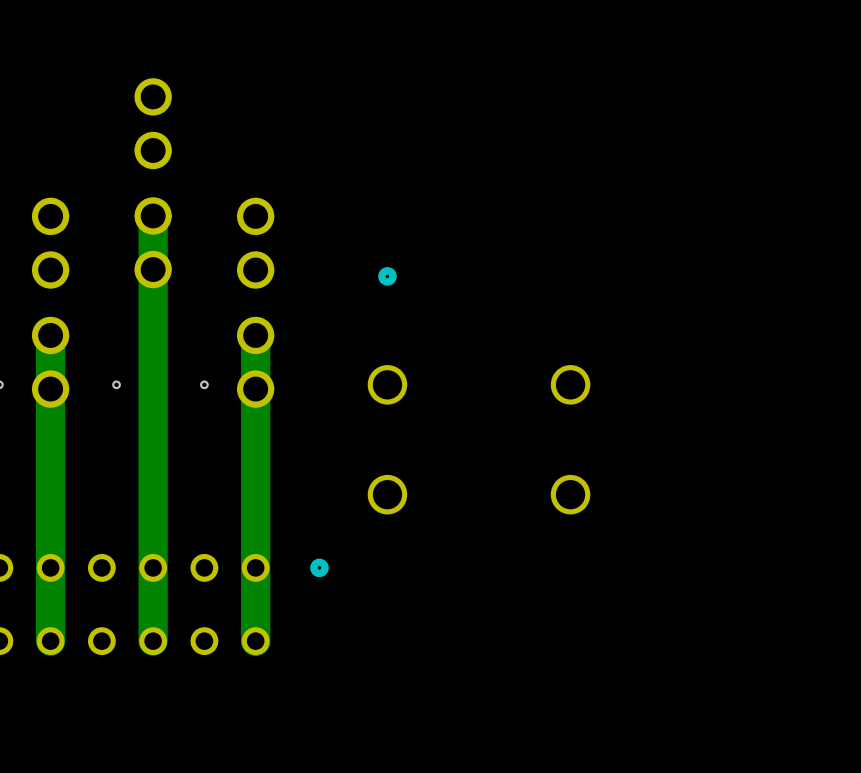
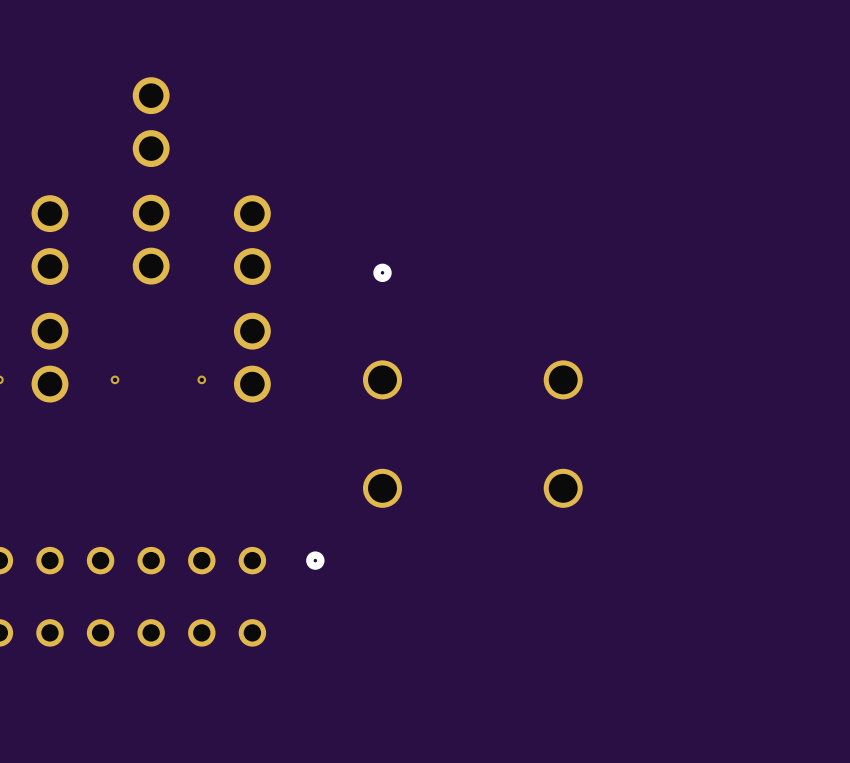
track: (153, 215) (153, 641) -> none
track: (50, 335) (50, 641) -> none
track: (255, 335) (255, 641) -> none

